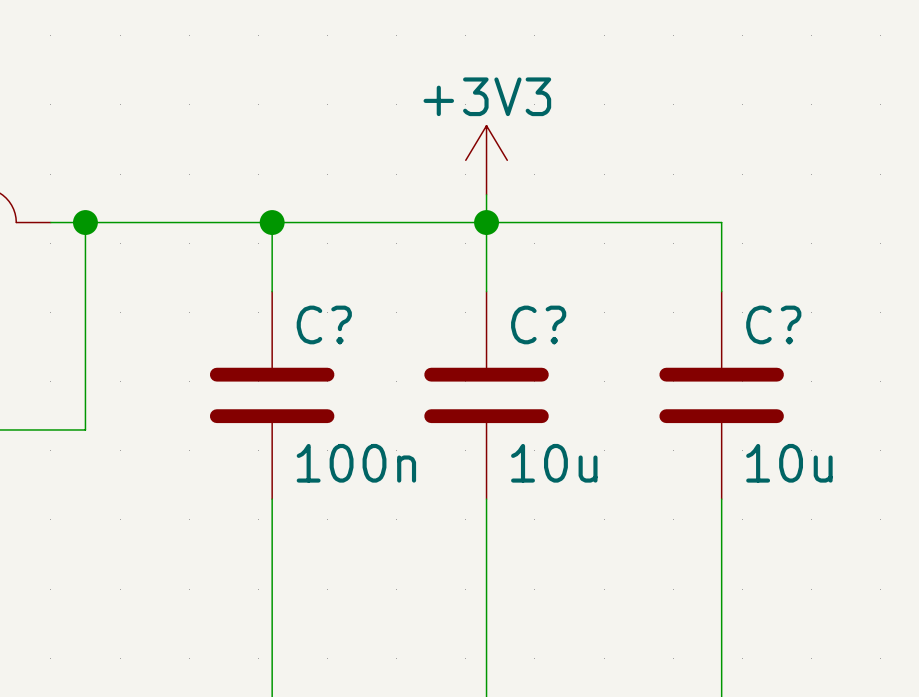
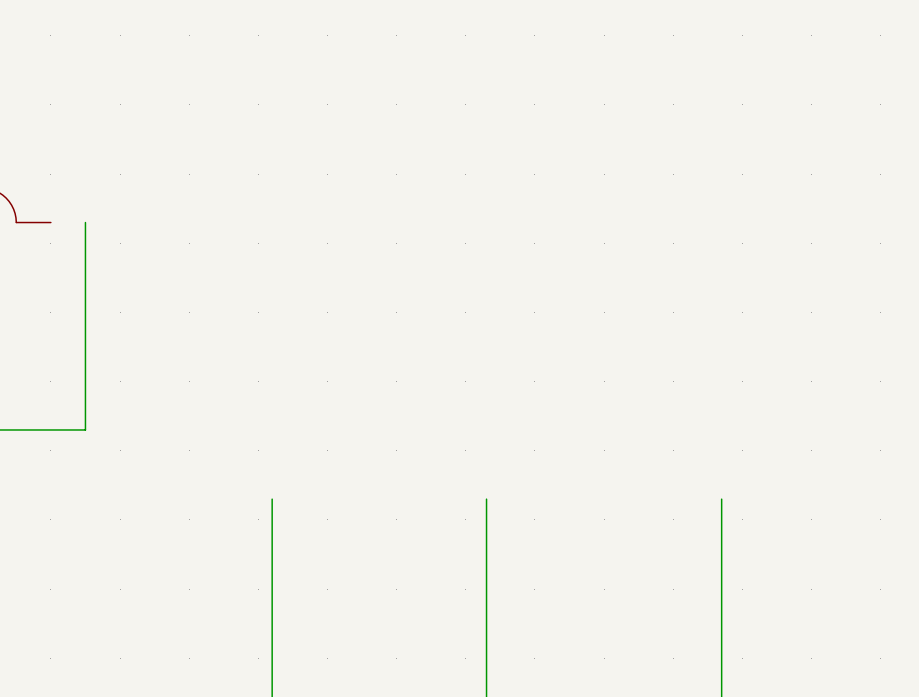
power symbol: +3V3 (486, 160) -> none
wire: (486, 194) (486, 291) -> none
wire: (50, 222) (721, 222) (721, 291) -> none
junction: (85, 222) -> none
wire: (272, 222) (272, 291) -> none
junction: (272, 222) -> none
junction: (486, 222) -> none
C?: 100n (272, 395) -> none
C?: 10u (486, 395) -> none
C?: 10u (721, 395) -> none

